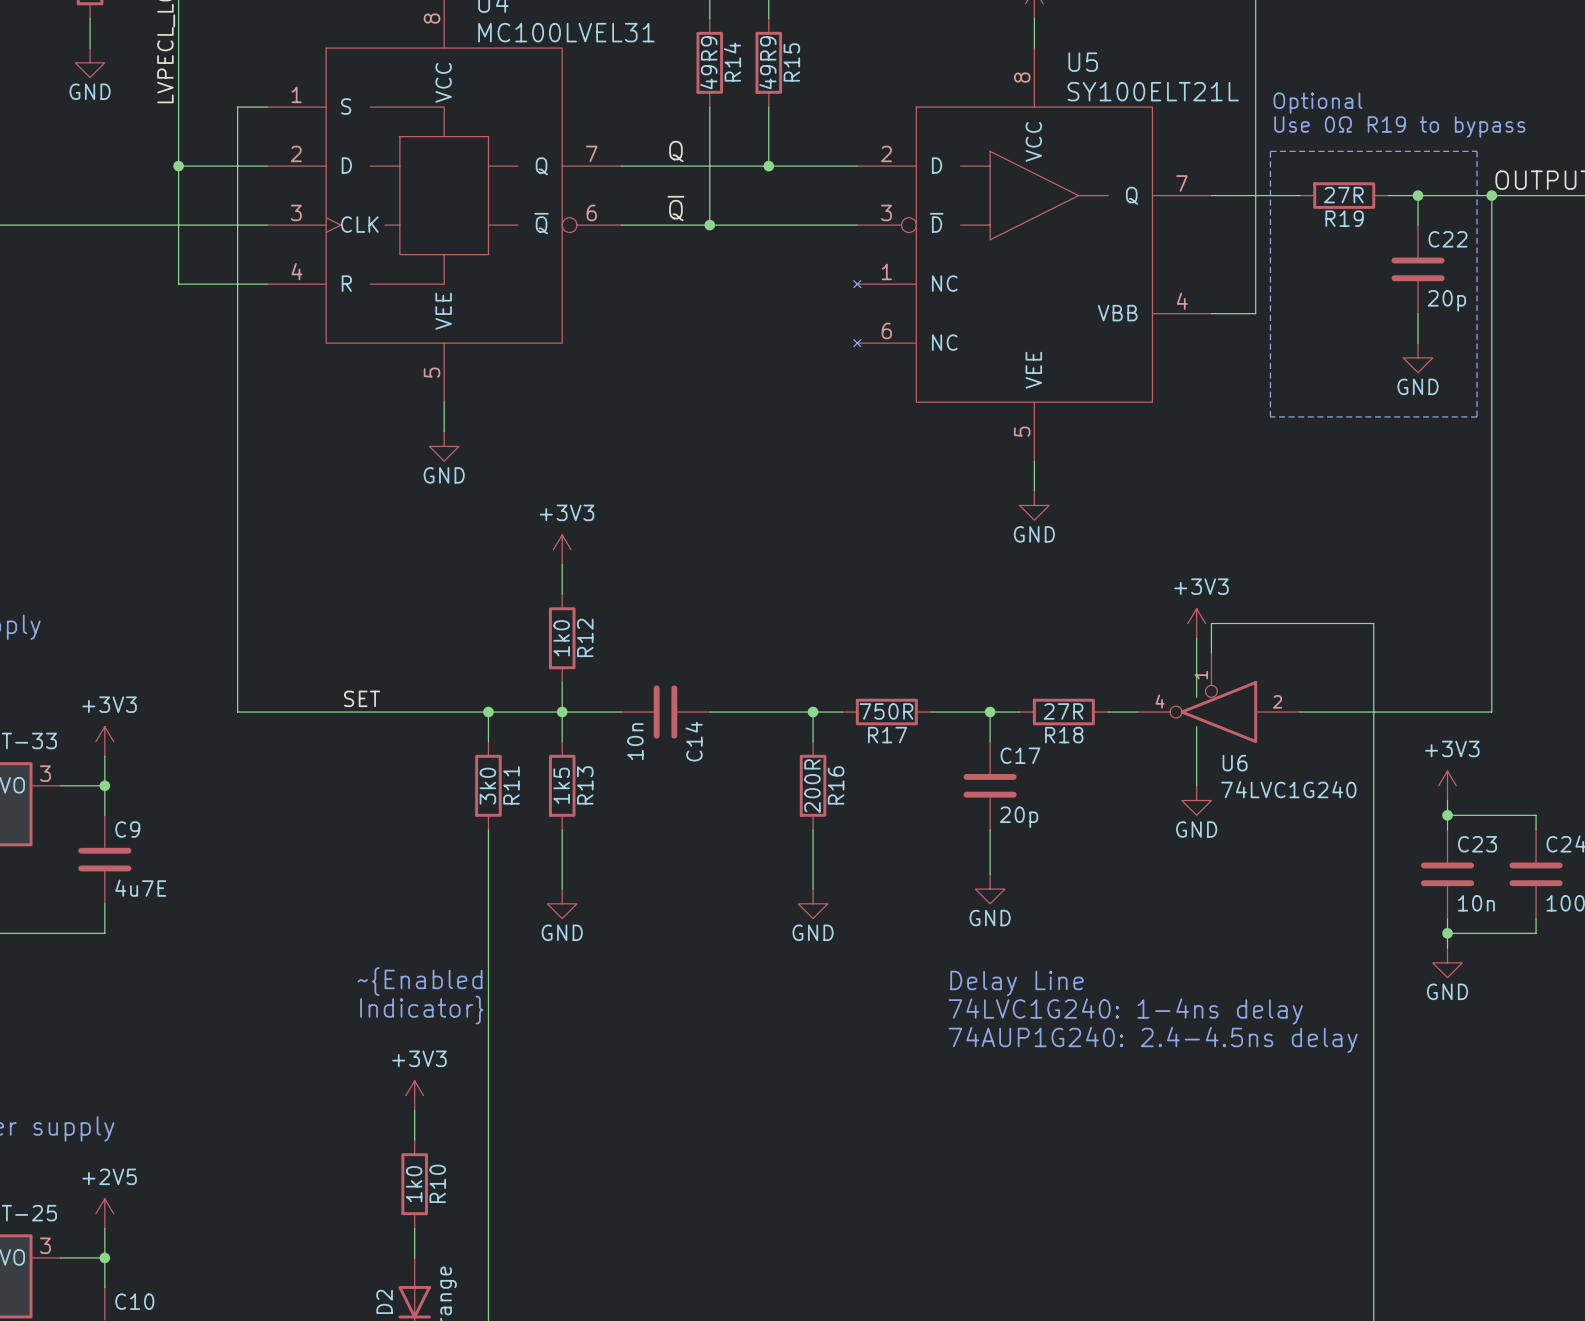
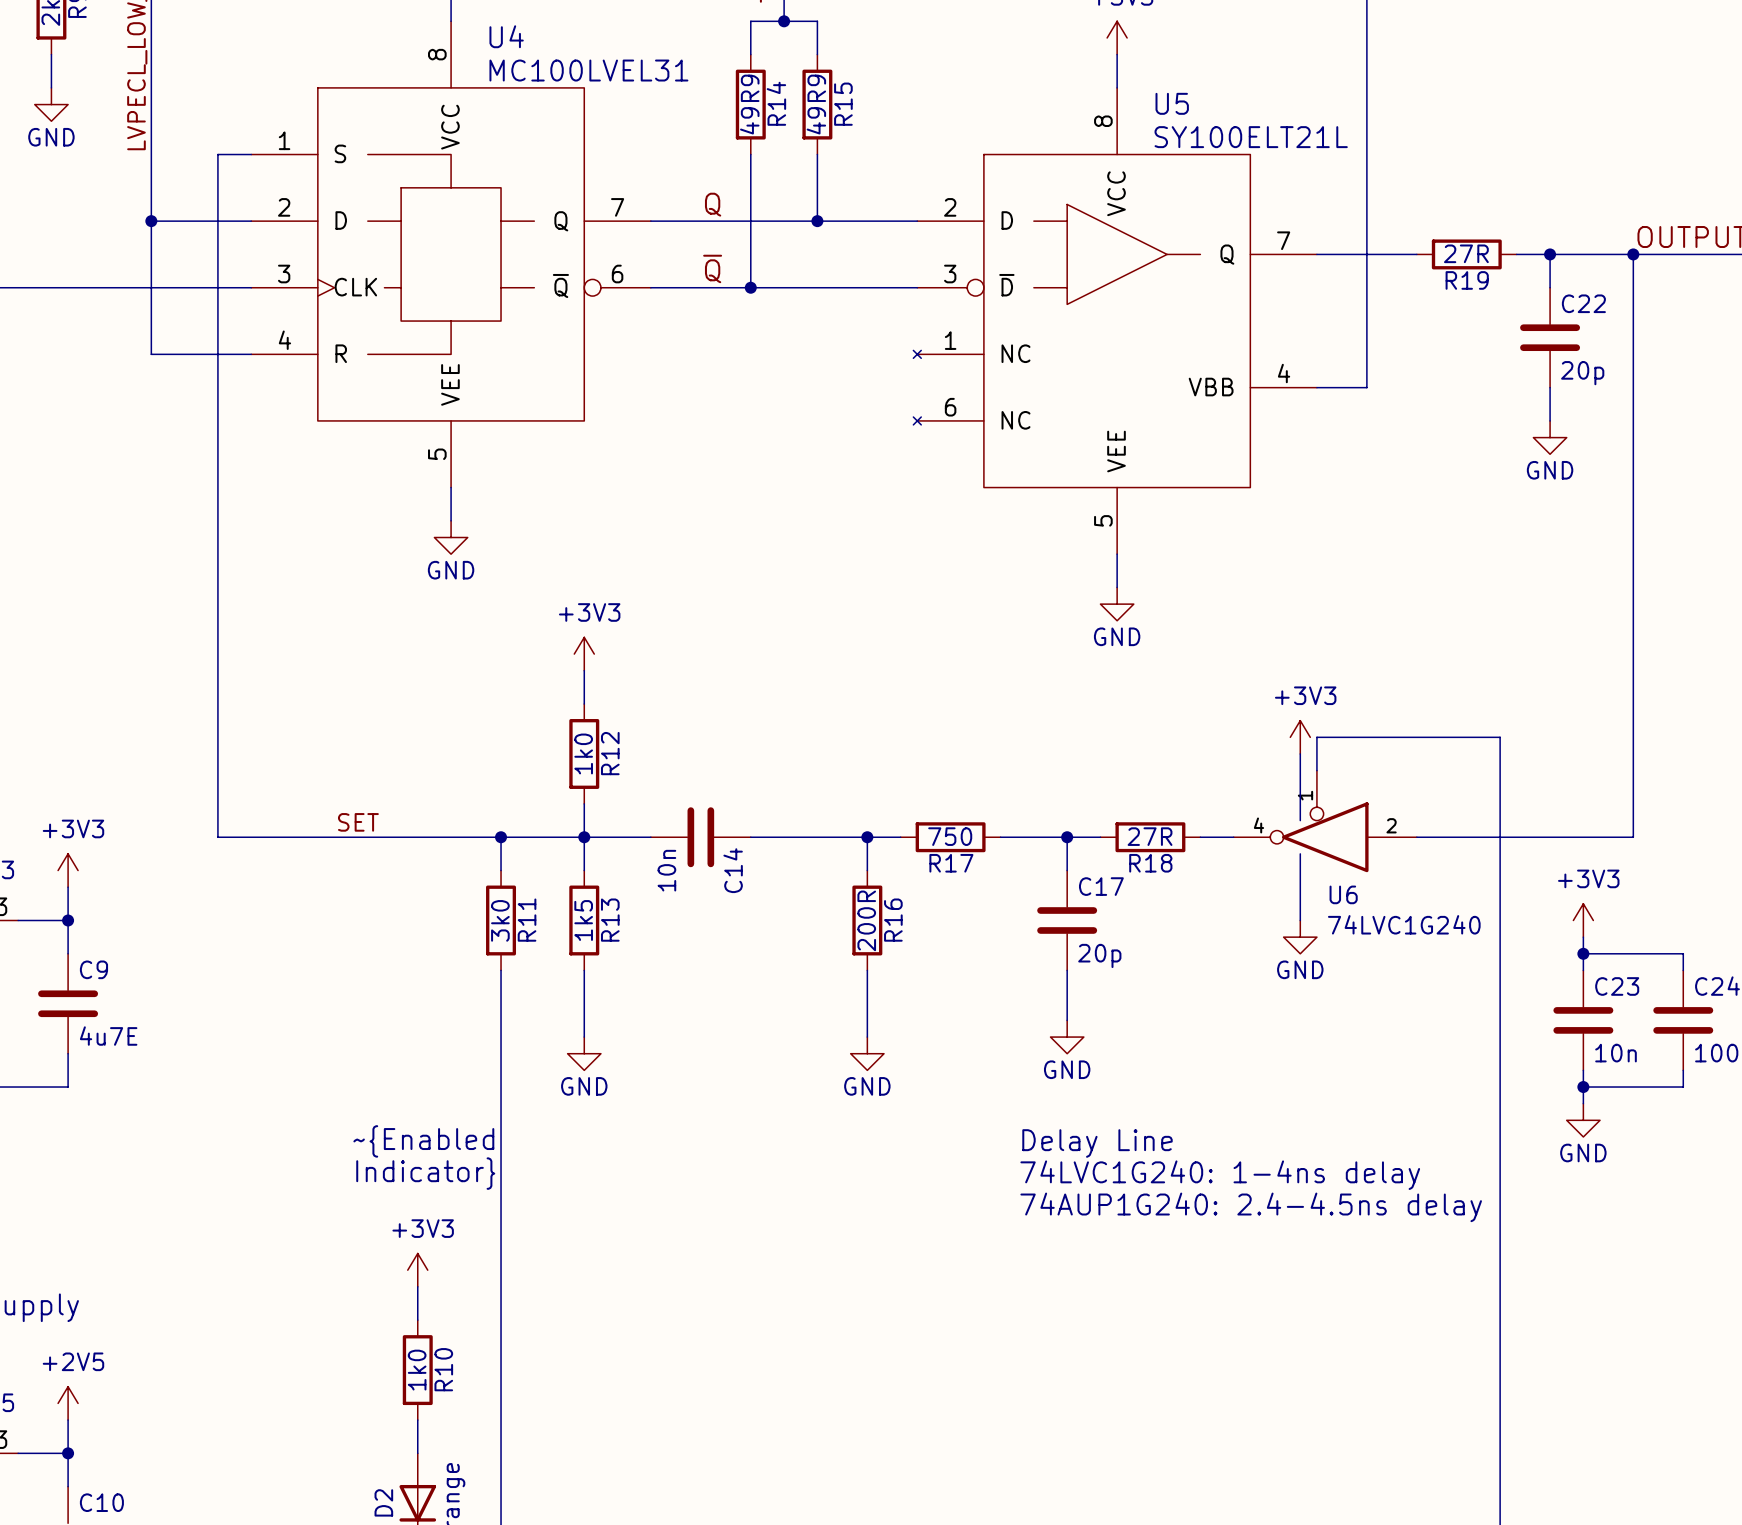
text: Optional (1317, 103) -> none
text: Use 0Ω R19 to bypass (1399, 126) -> none
line: (1270, 151) (1477, 151) (1477, 416) (1270, 416) (1270, 151) -> none
R17 value: 750R (886, 711) -> 750 (950, 836)

